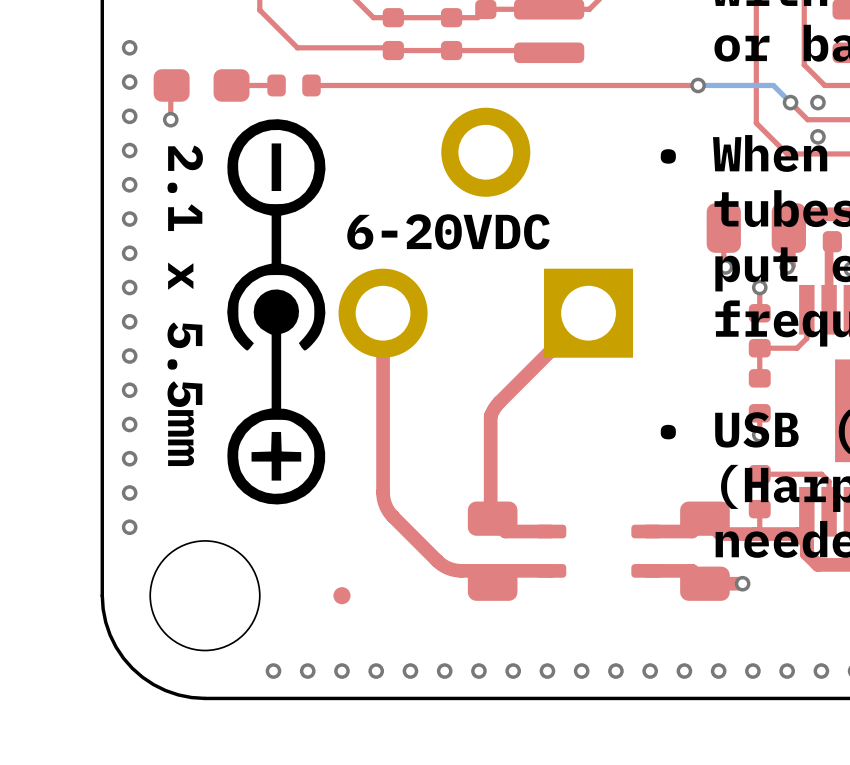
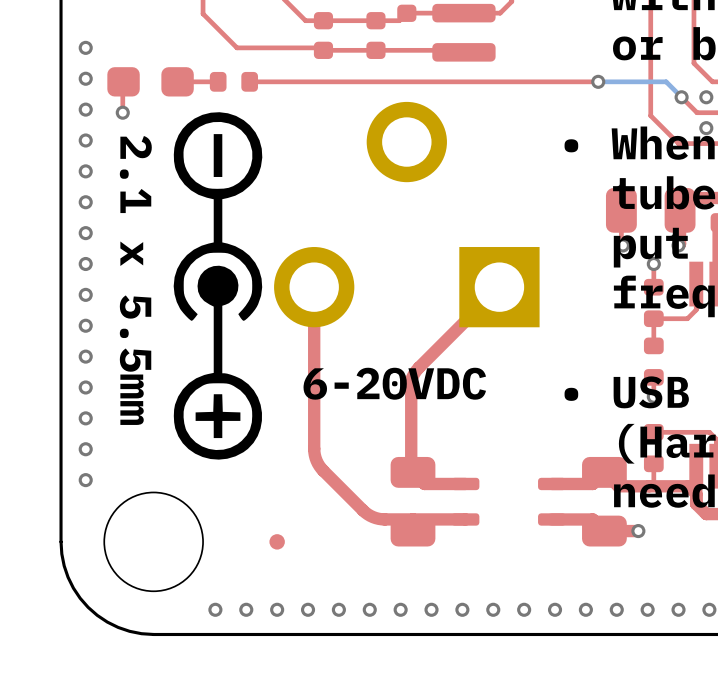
text position: 6-20VDC (448, 231) -> 6-20VDC (394, 383)

